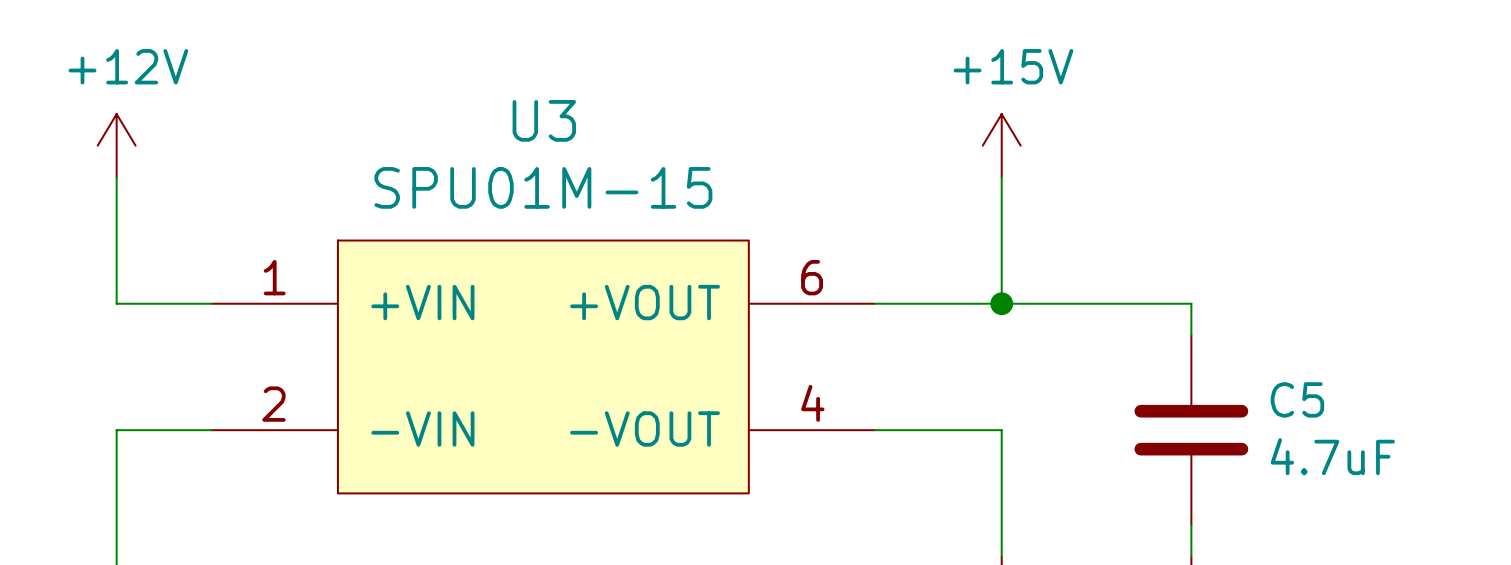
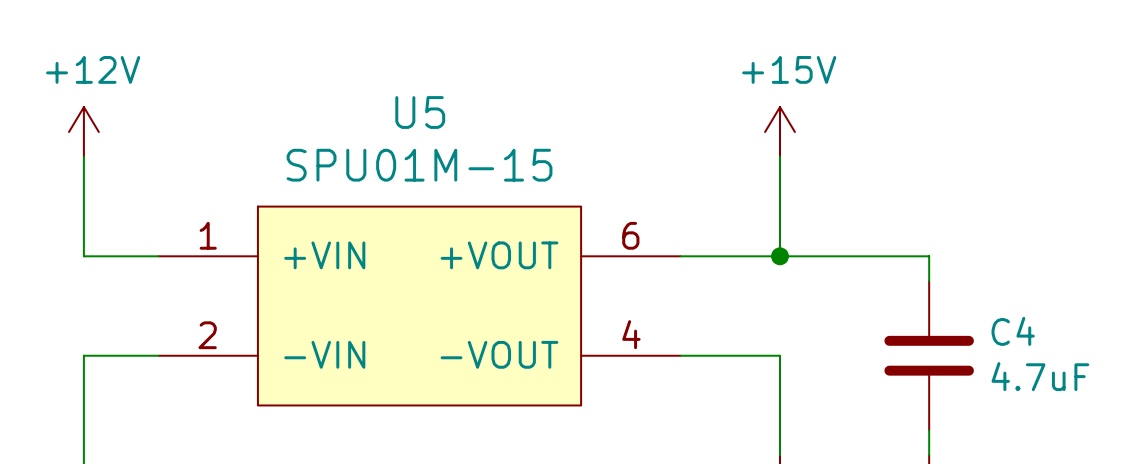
U3 name: U3 (544, 120) -> U5 (420, 112)
C5 name: C5 (1297, 399) -> C4 (1013, 331)

